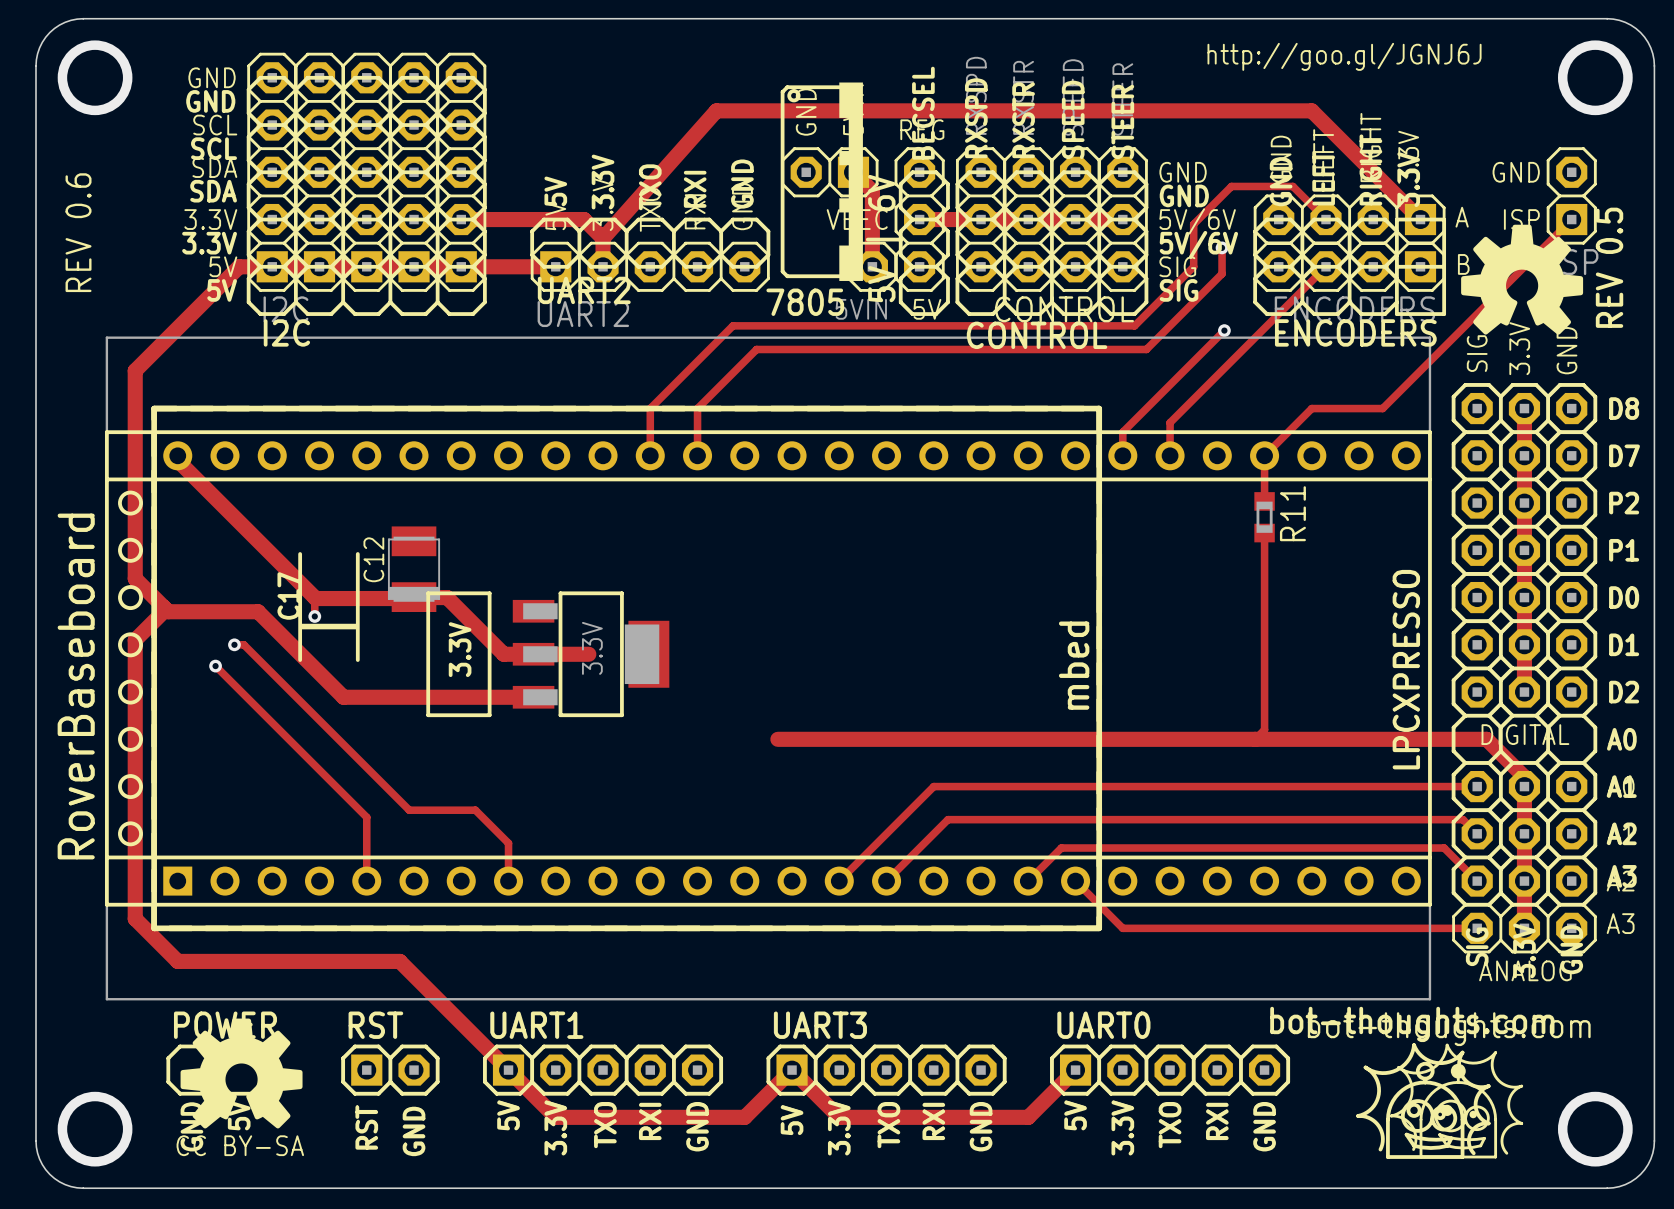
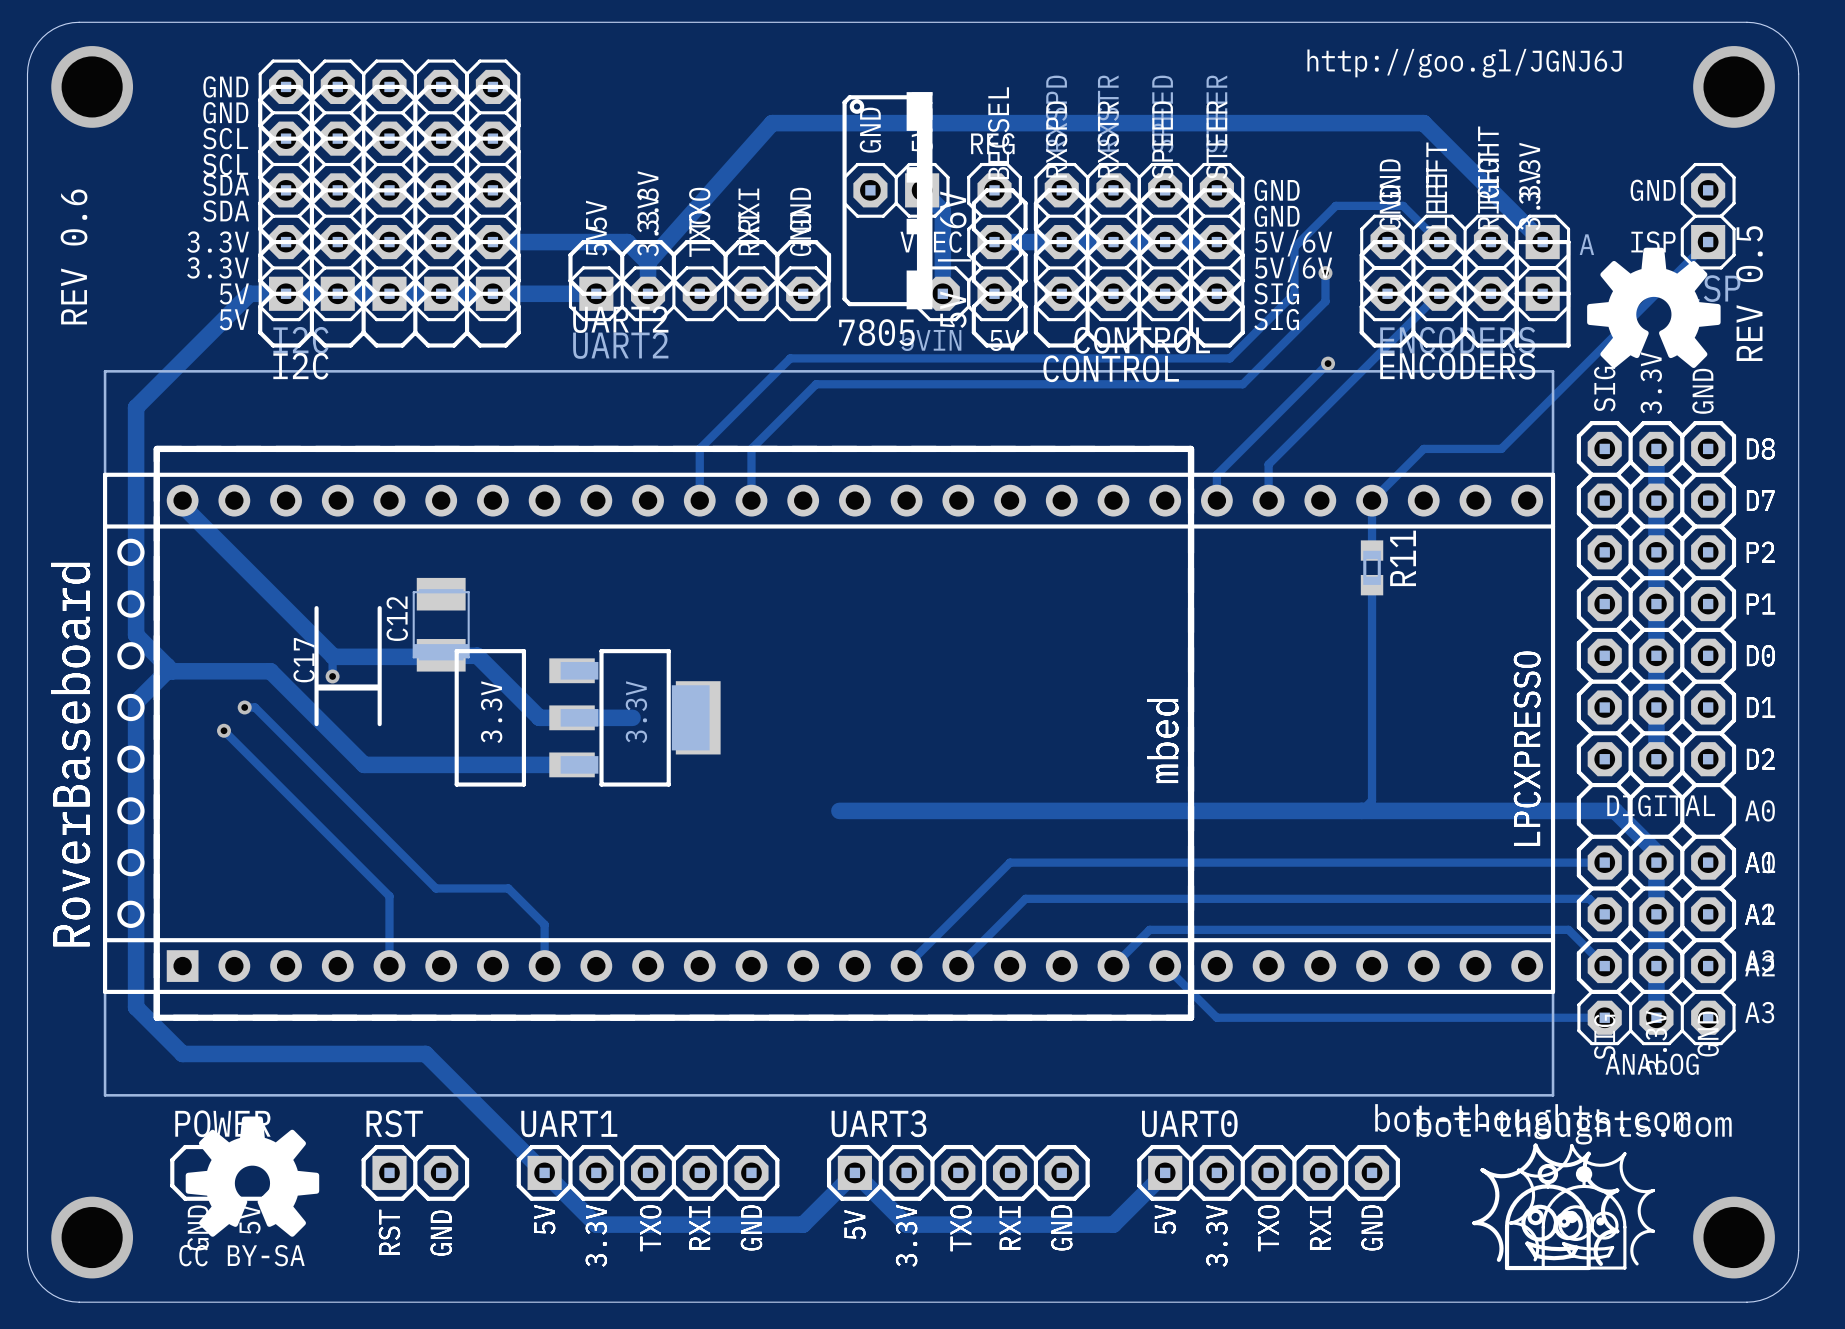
text: A (1462, 217) -> none
part value: none -> A (1586, 244)
text: B (1463, 264) -> none

